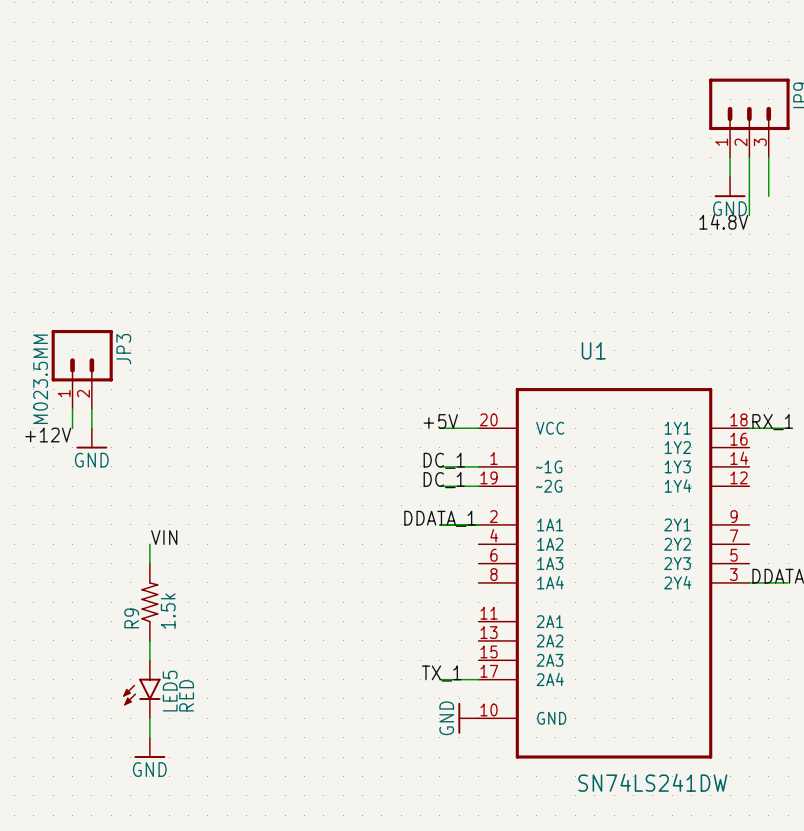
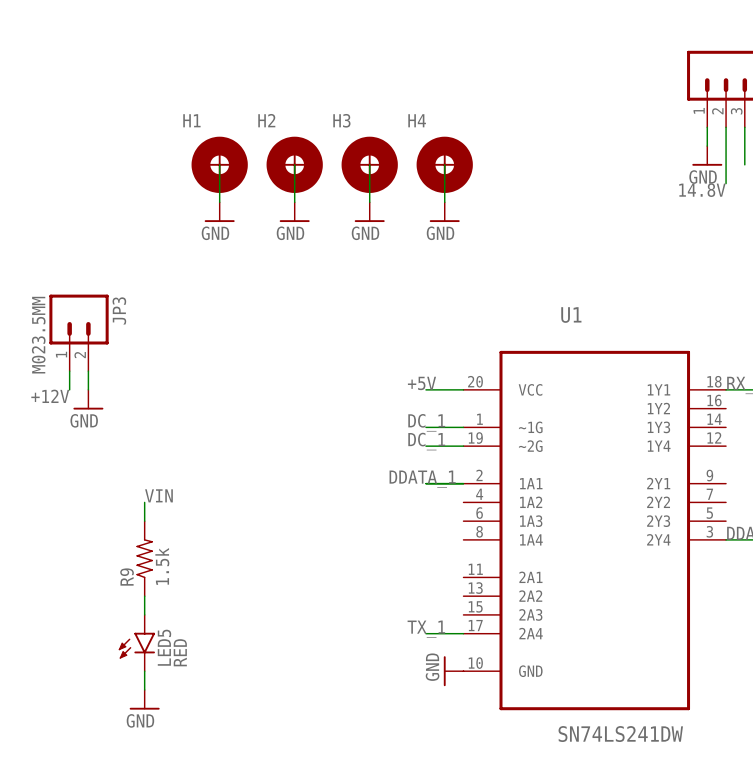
wire: none -> (219, 164) (219, 202)
H1: none -> (219, 164)
wire: none -> (294, 164) (294, 202)
H2: none -> (294, 164)
wire: none -> (369, 164) (369, 202)
H3: none -> (369, 164)
wire: none -> (444, 164) (444, 202)
H4: none -> (444, 164)
power symbol: none -> GND (219, 212)
power symbol: none -> GND (294, 212)
power symbol: none -> GND (369, 212)
power symbol: none -> GND (444, 212)

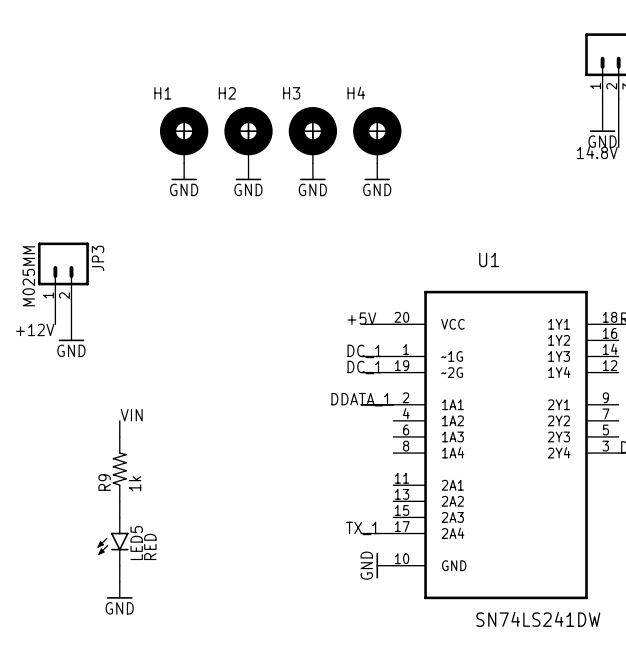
JP3 value: M023.5MM (38, 335) -> M025MM (28, 276)
R9 value: 1.5k (162, 566) -> 1k (135, 483)

